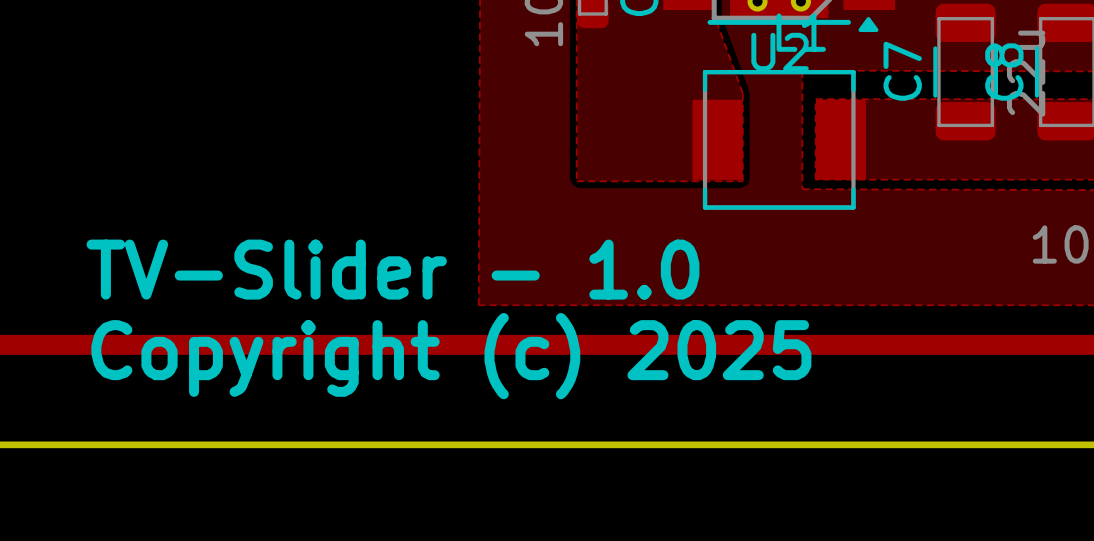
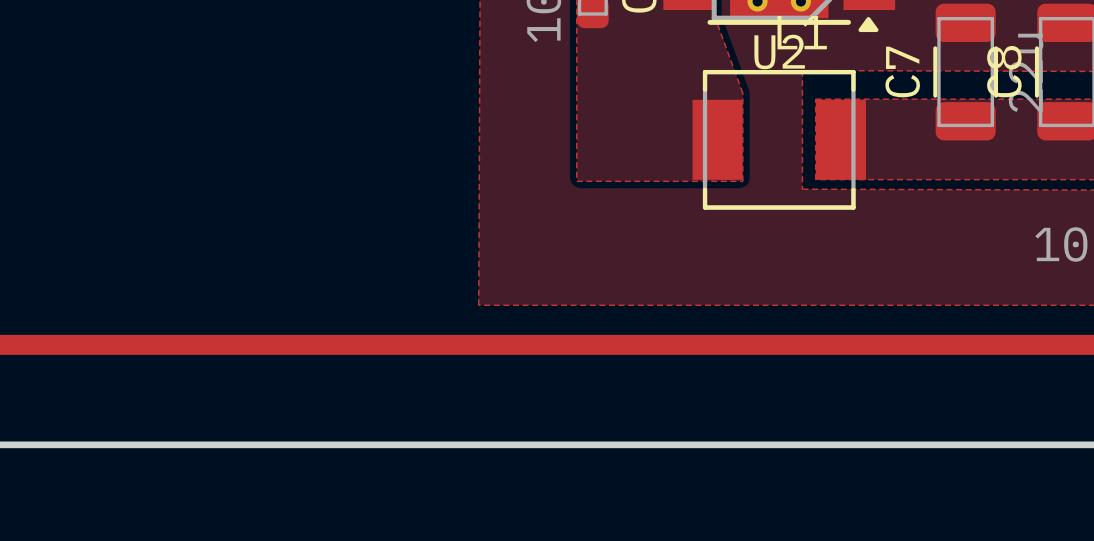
text: TV-Slider - 1.0 (393, 269) -> none
text: Copyright (c) 2025 (451, 356) -> none

